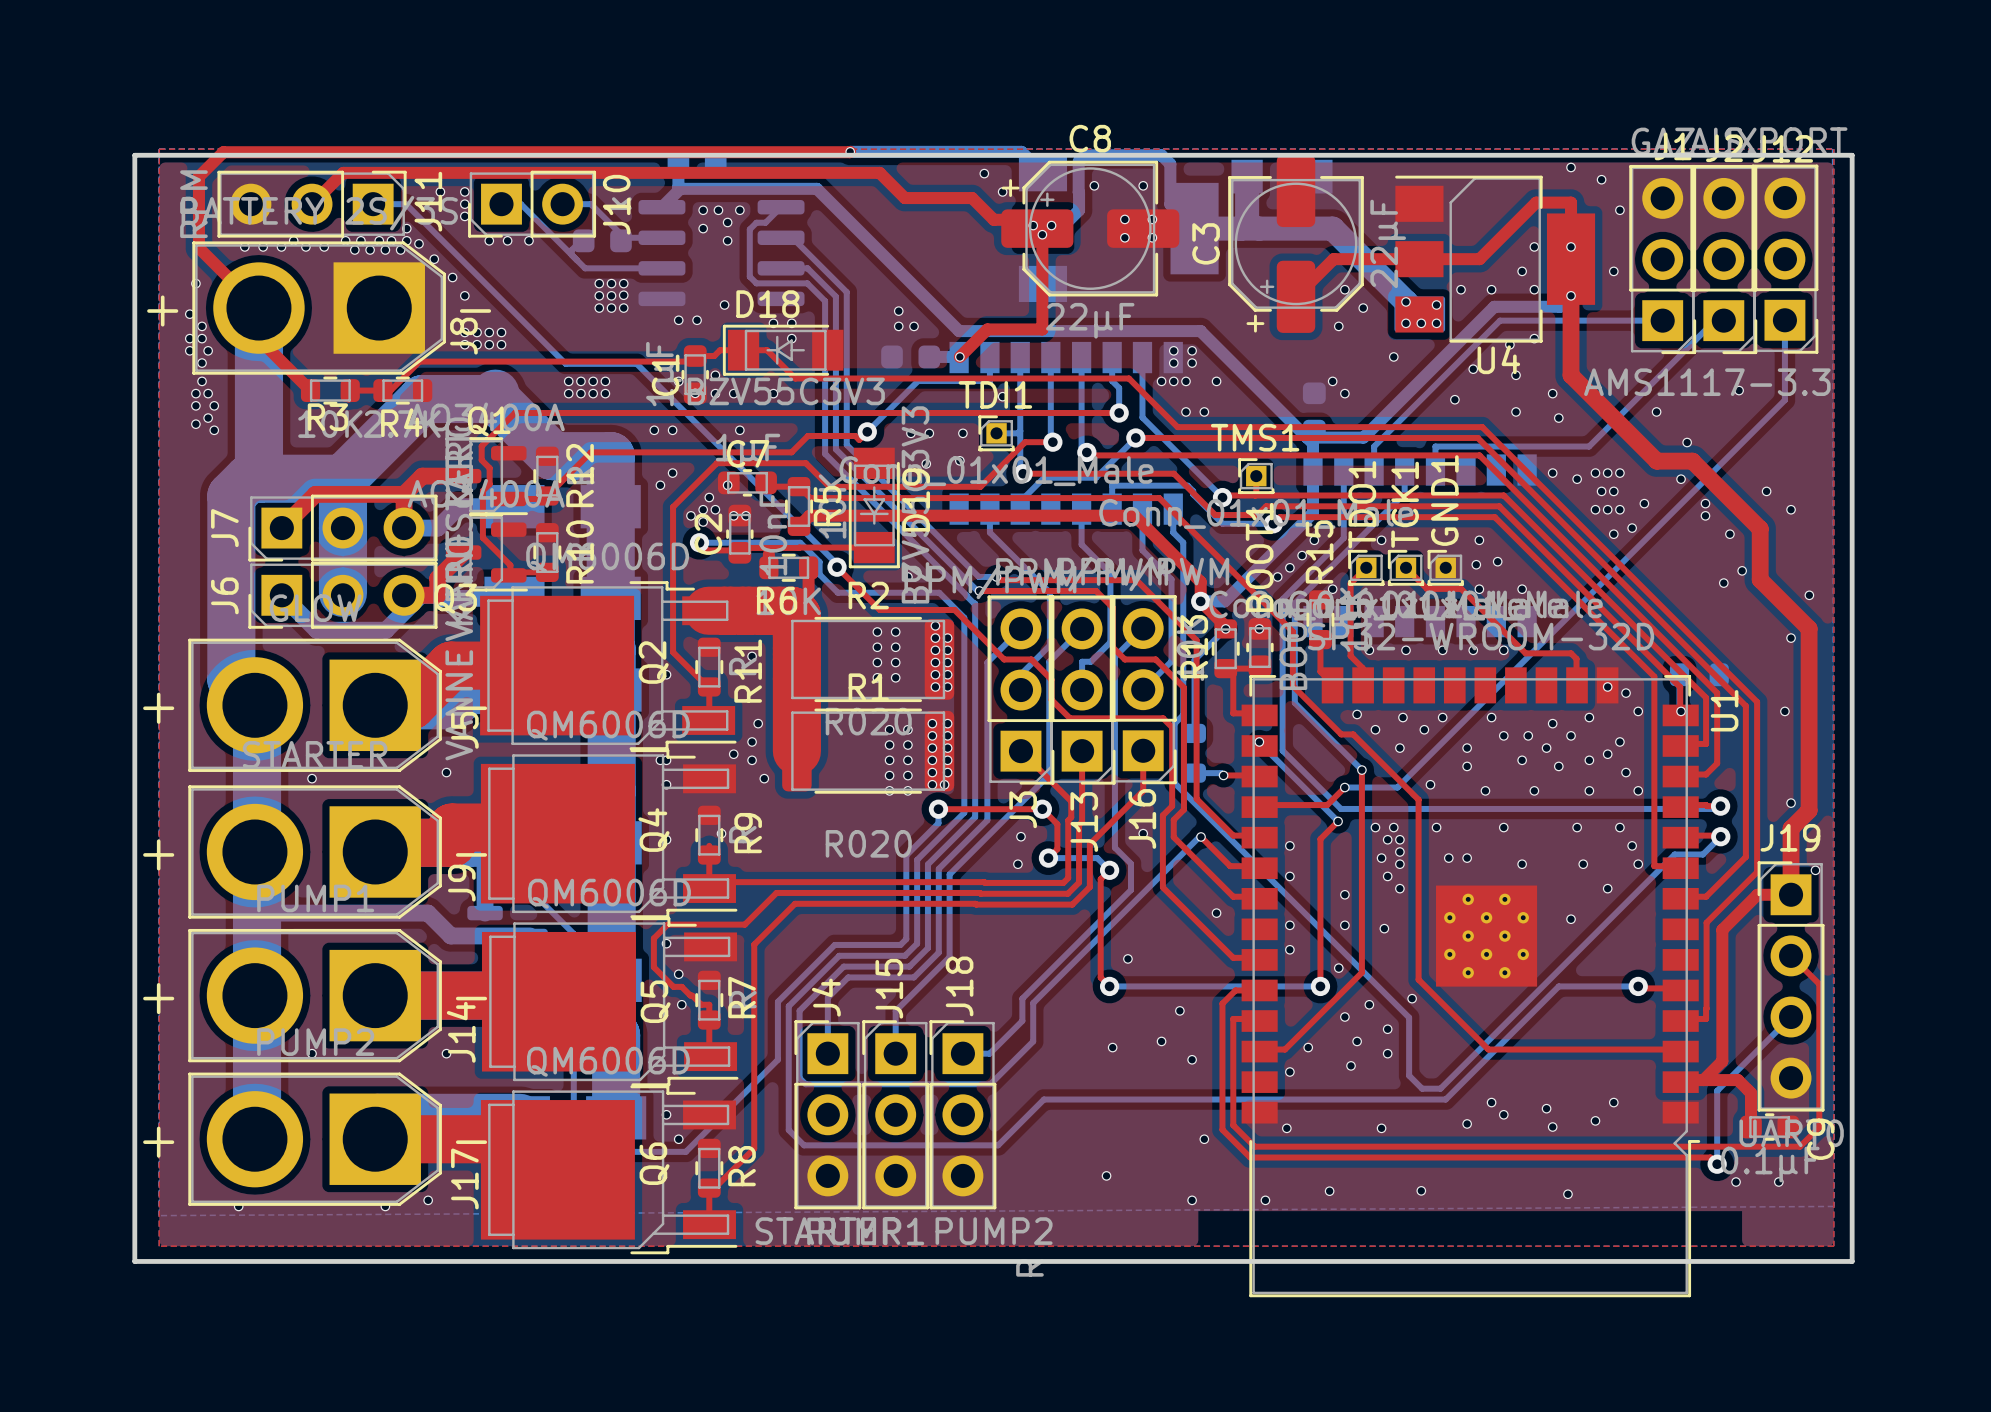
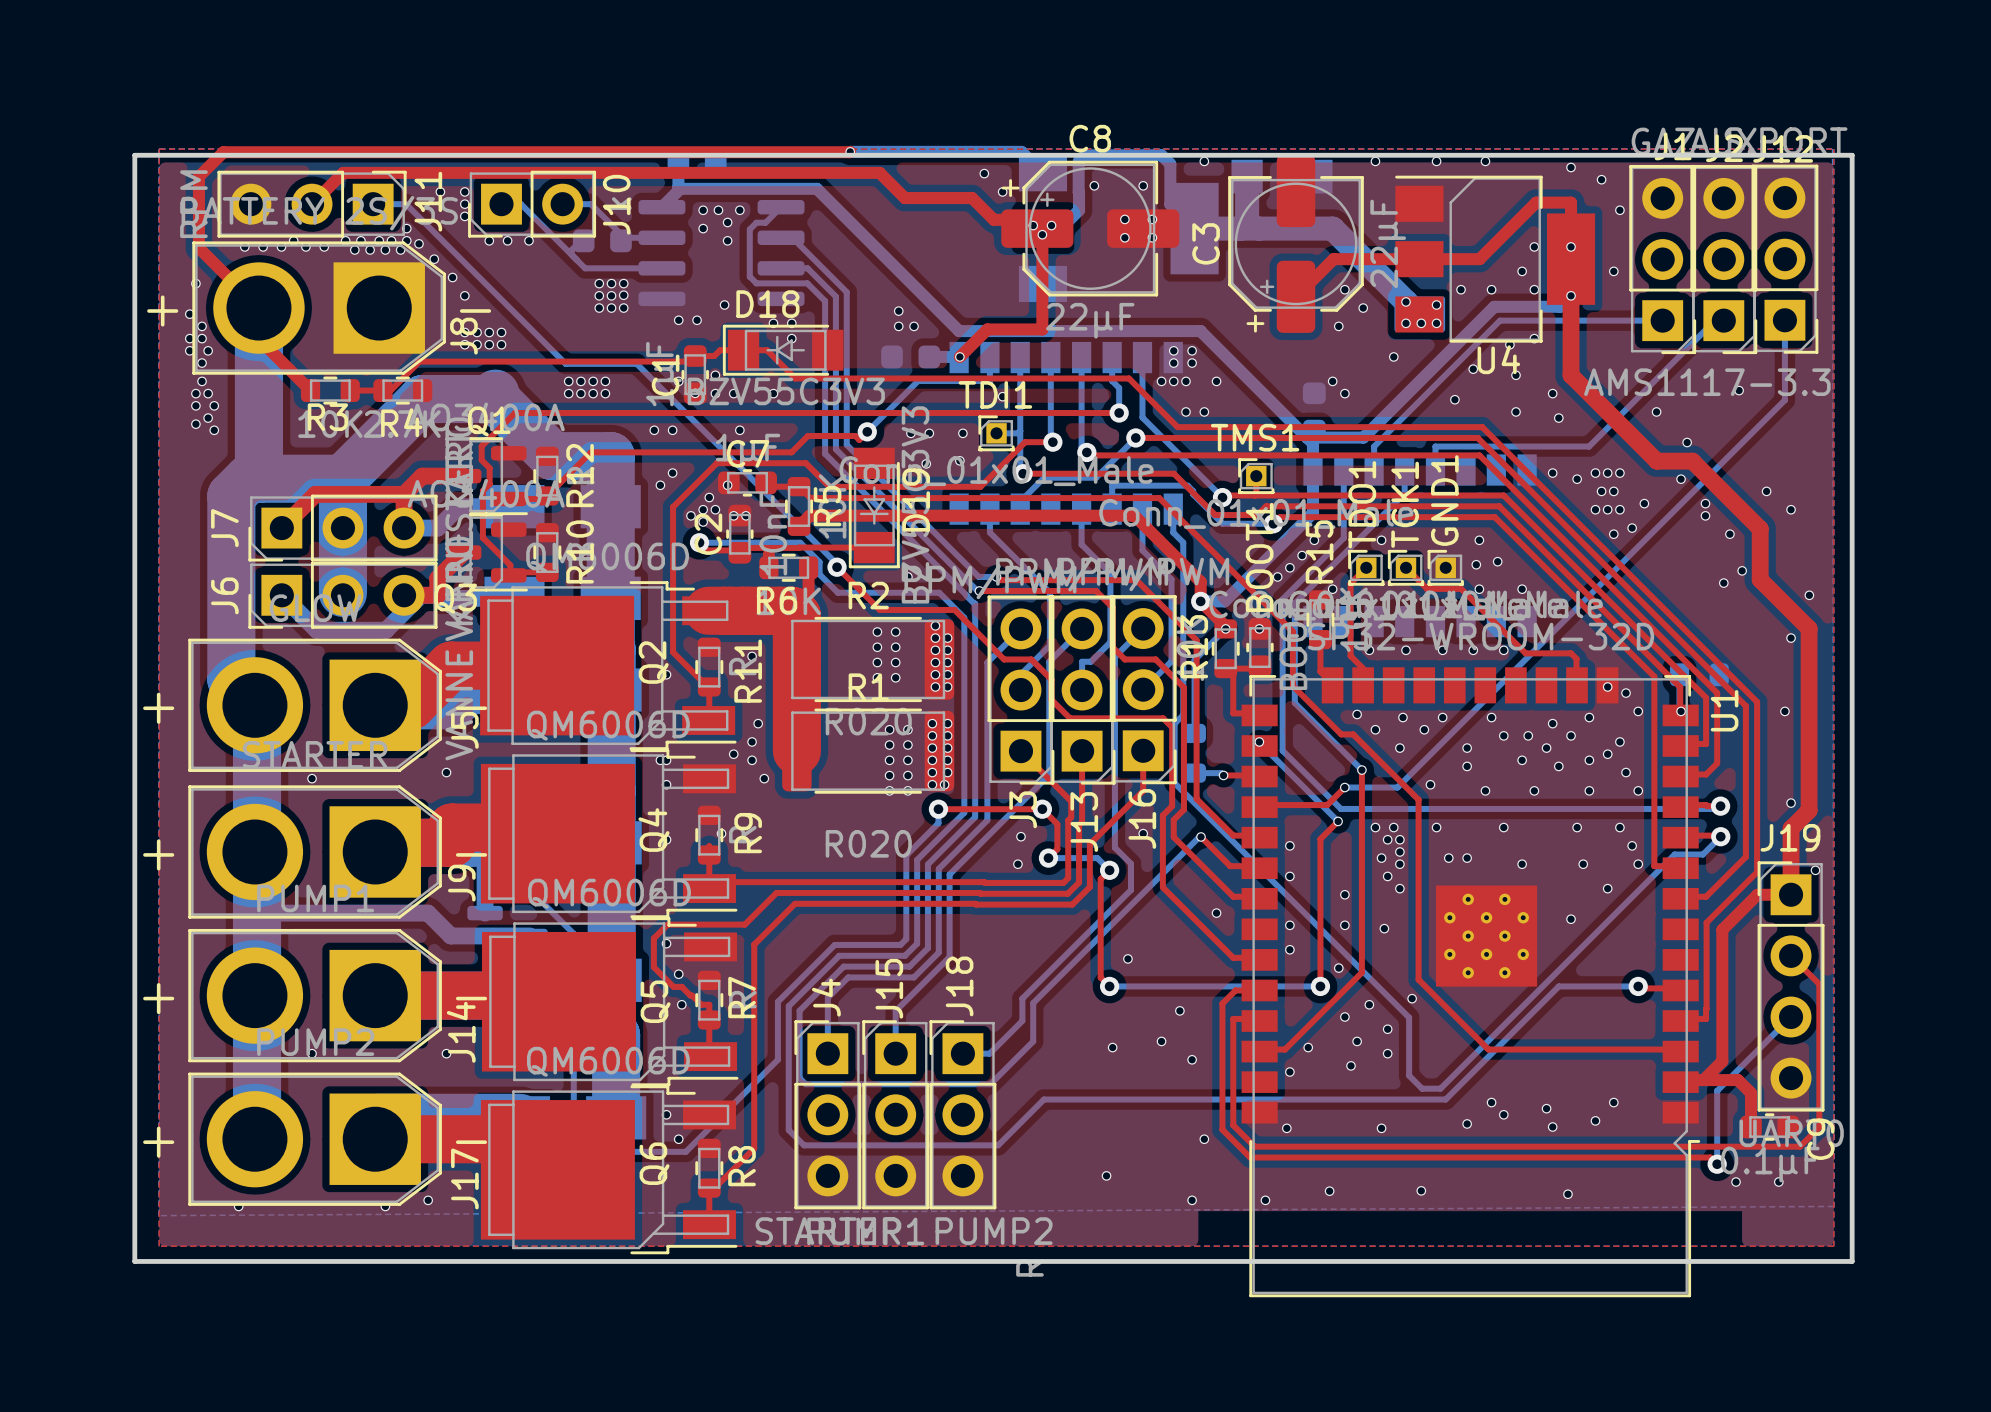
via: none -> (1204, 161)
via: none -> (1375, 161)
via: none -> (1436, 161)
via: none -> (1485, 161)

